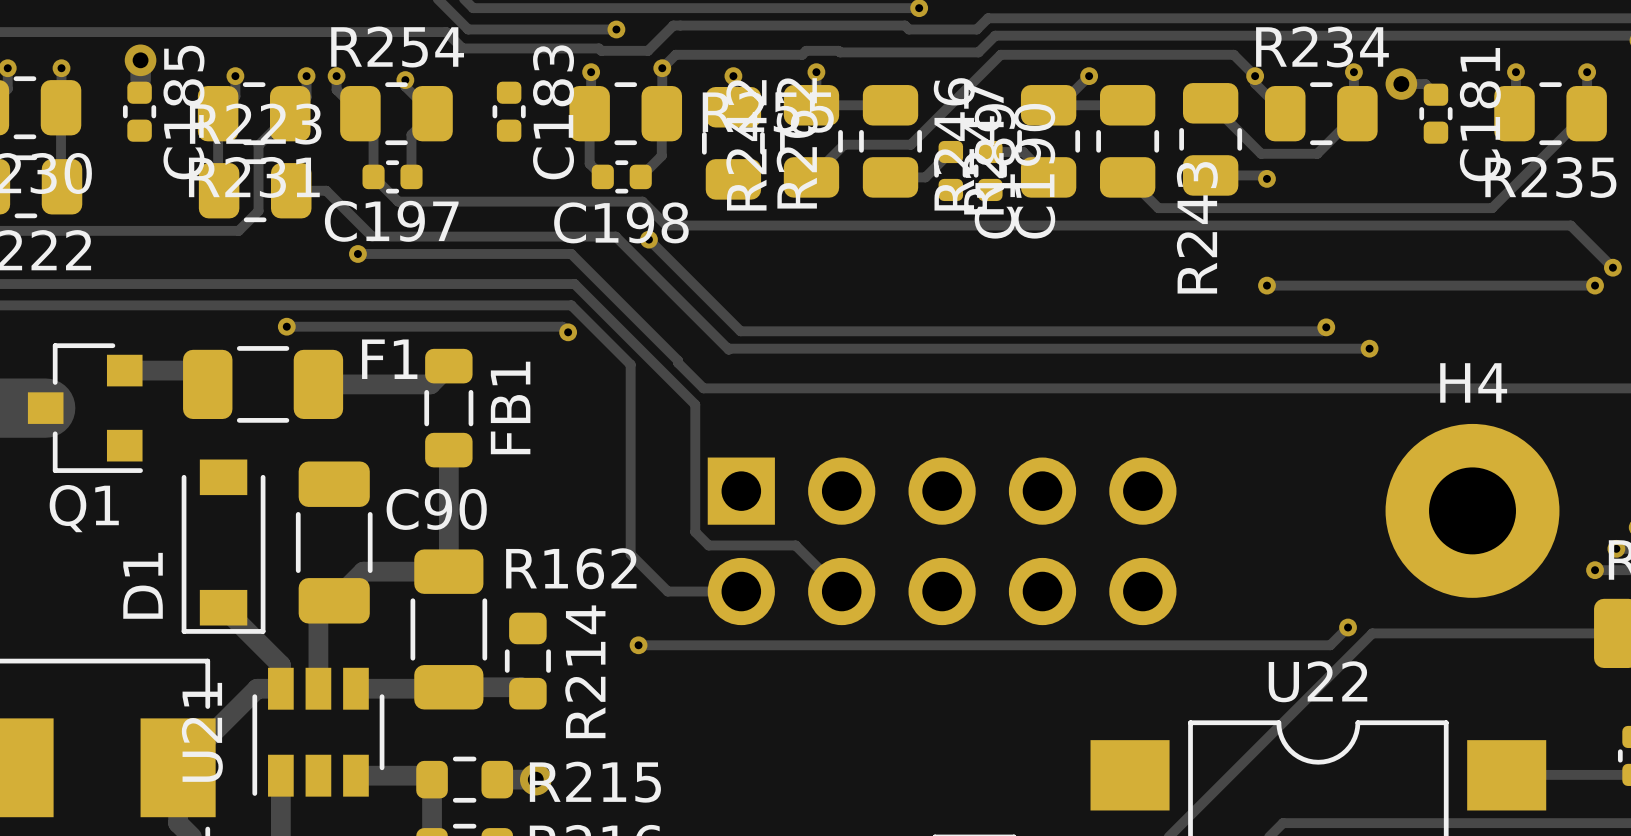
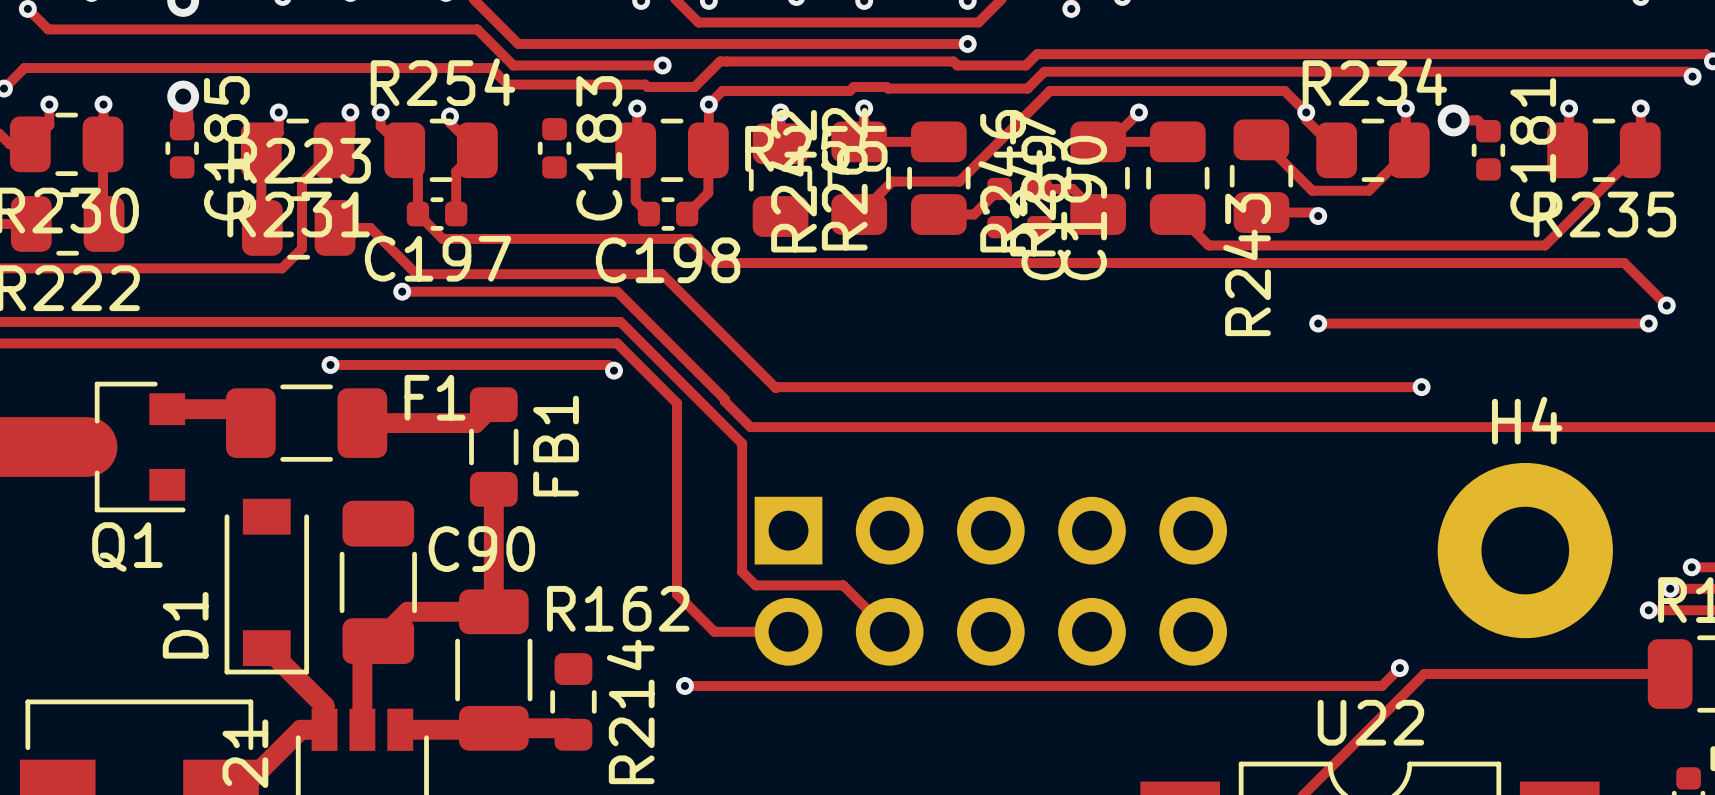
track: (648, 239) (740, 331) (1322, 331) (1326, 327) -> none
via: (648, 239) -> none
via: (1326, 327) -> none

